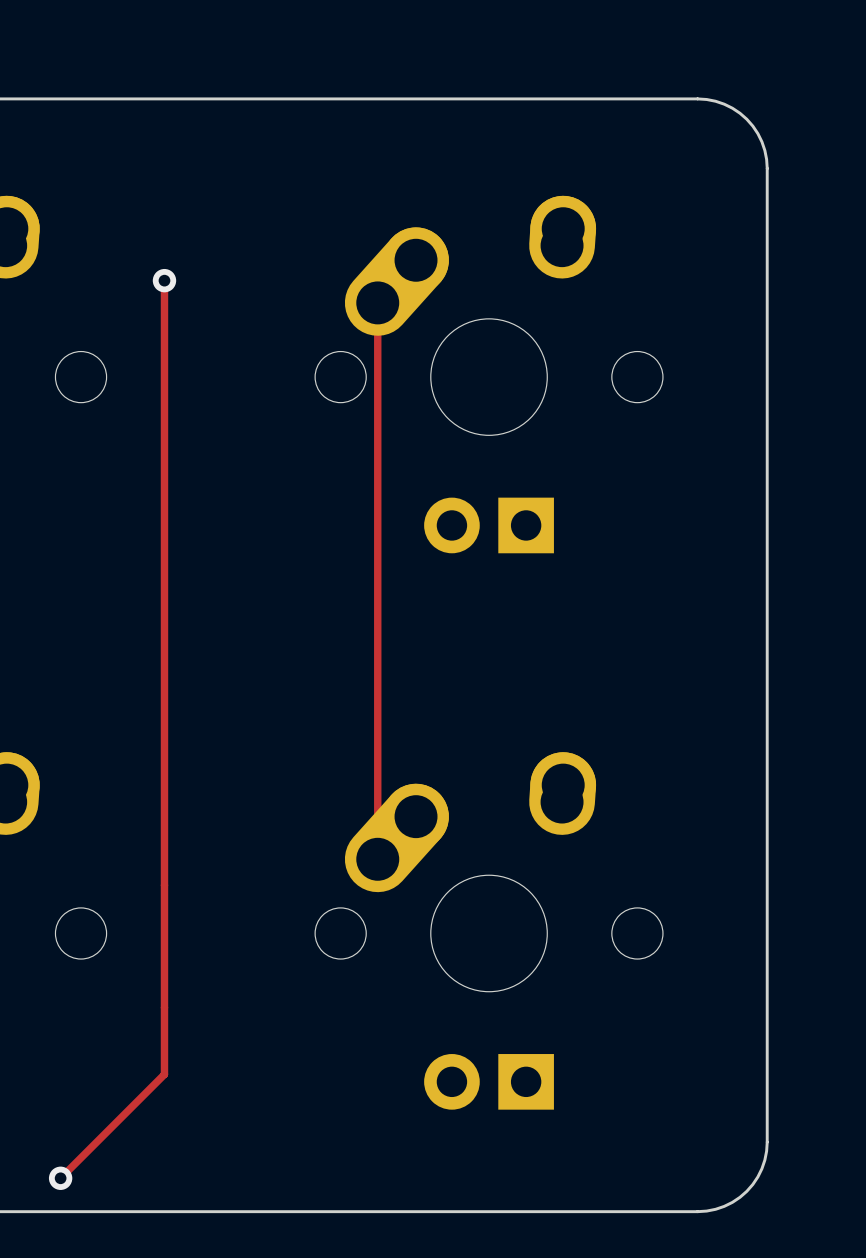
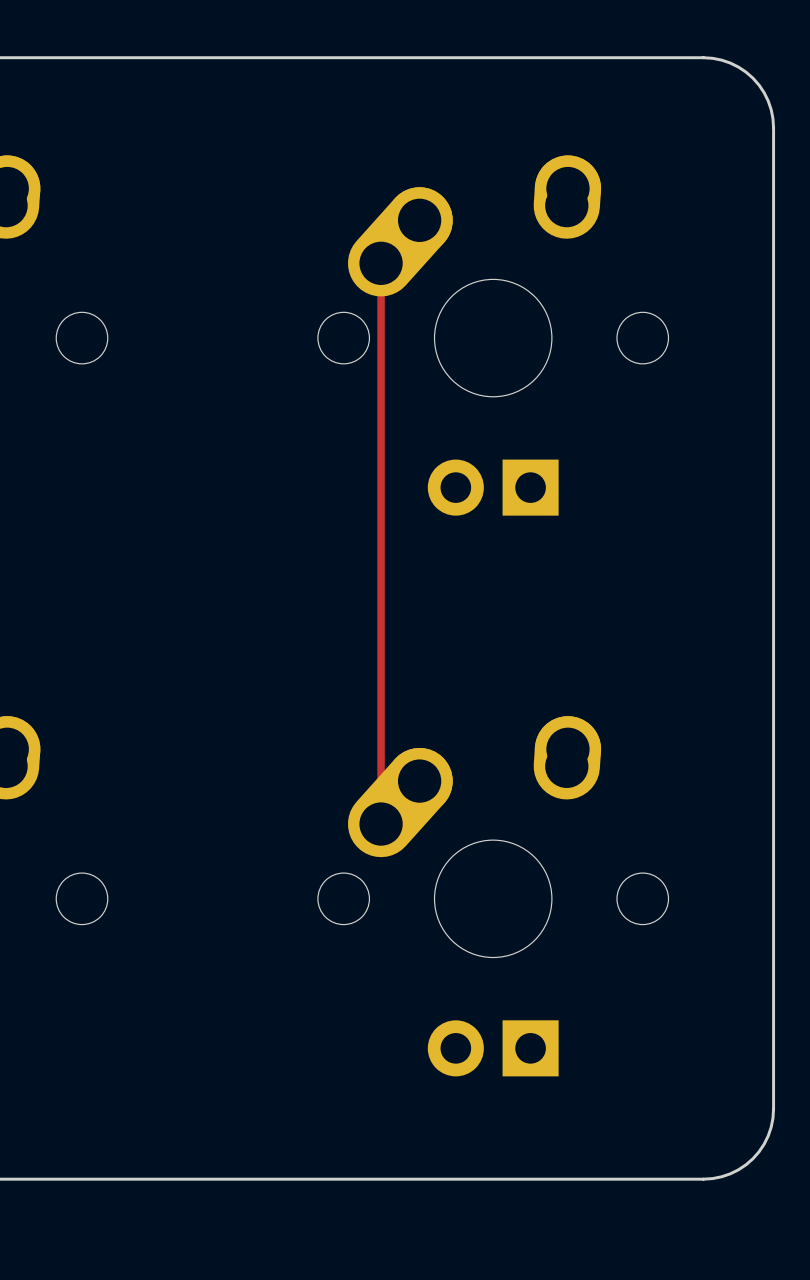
track: (164, 280) (164, 1074) (60, 1178) -> none
via: (164, 280) -> none
via: (60, 1178) -> none

